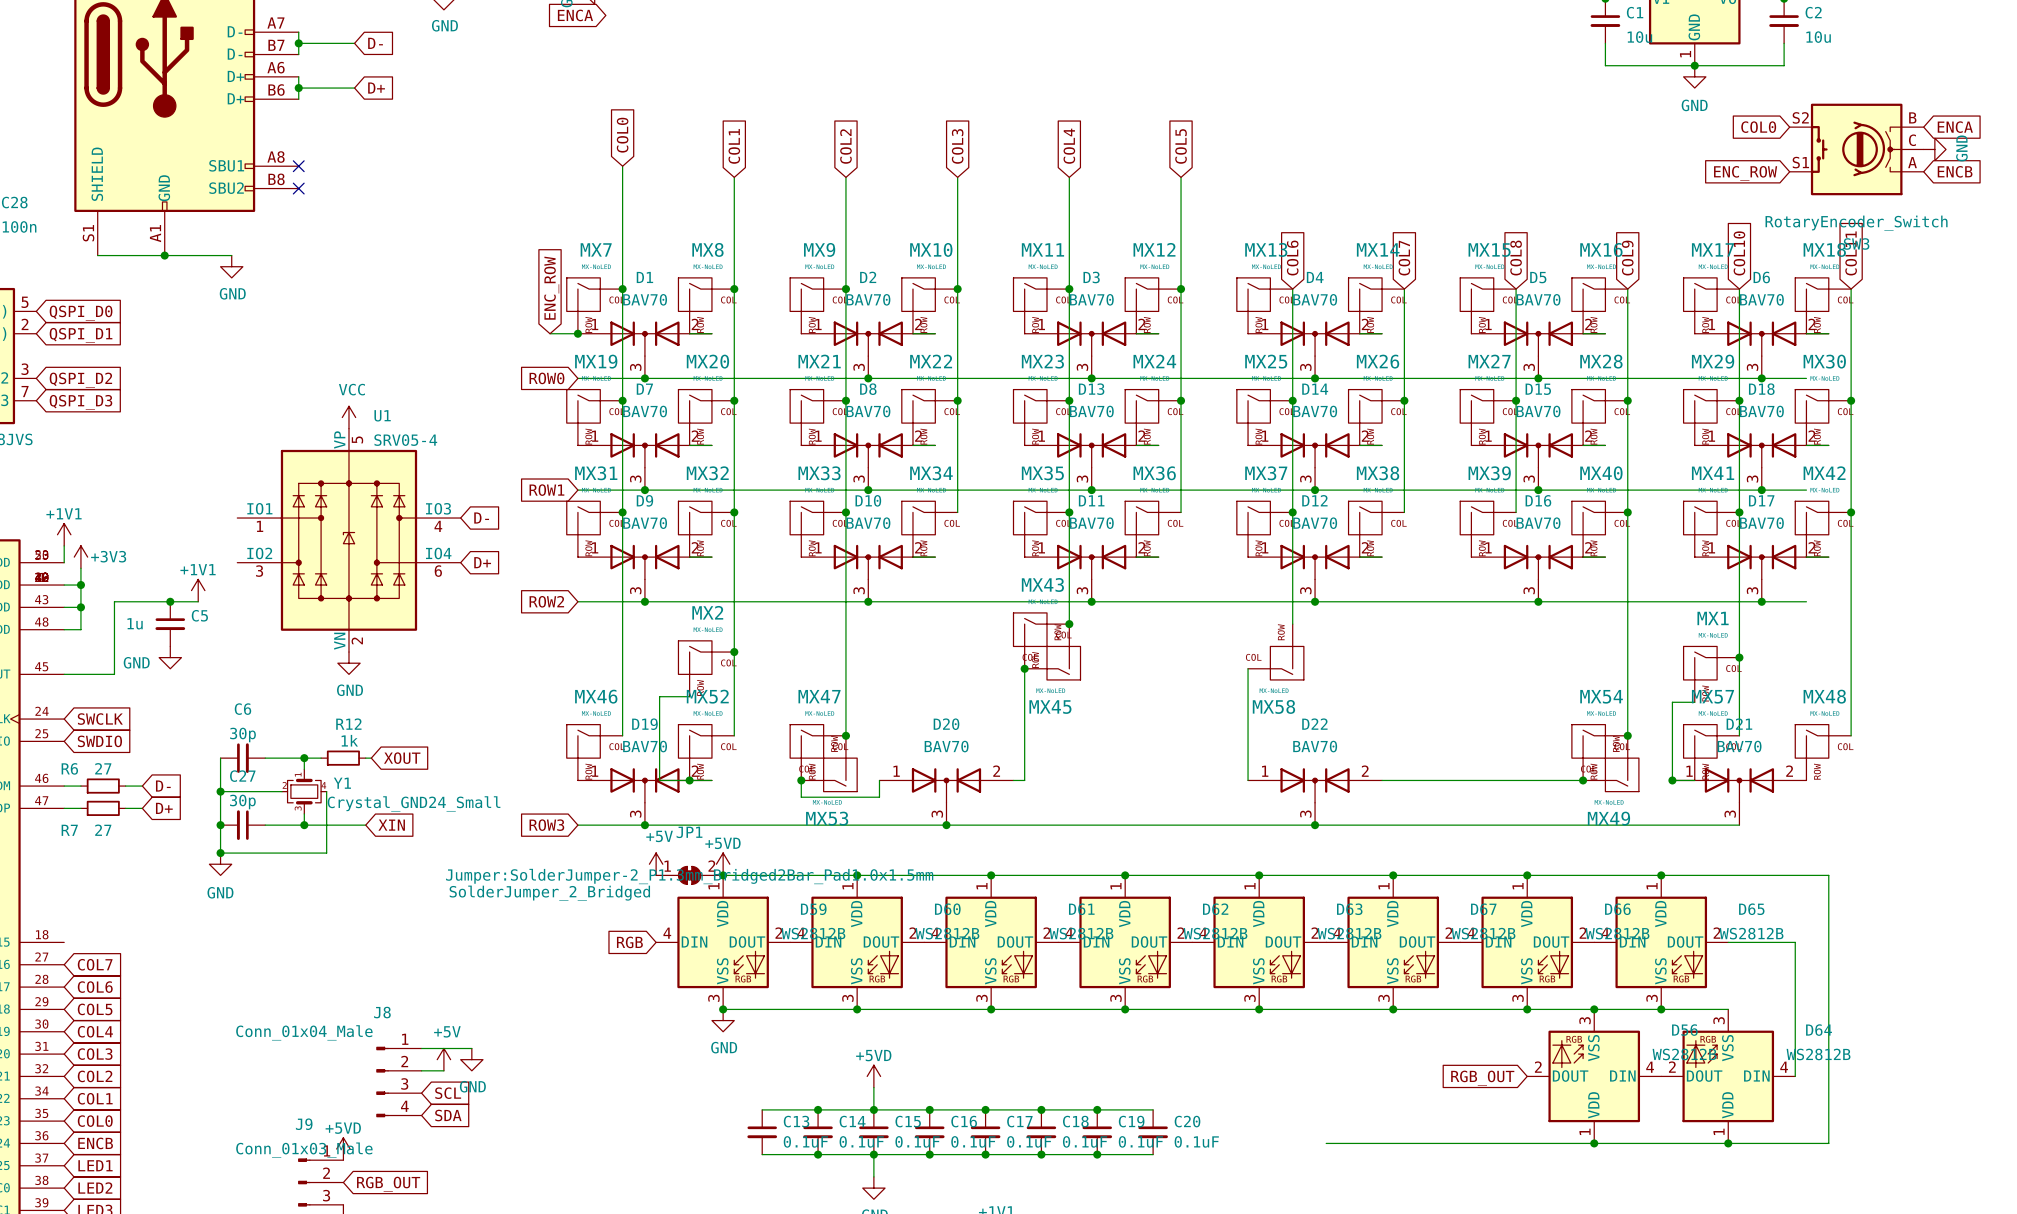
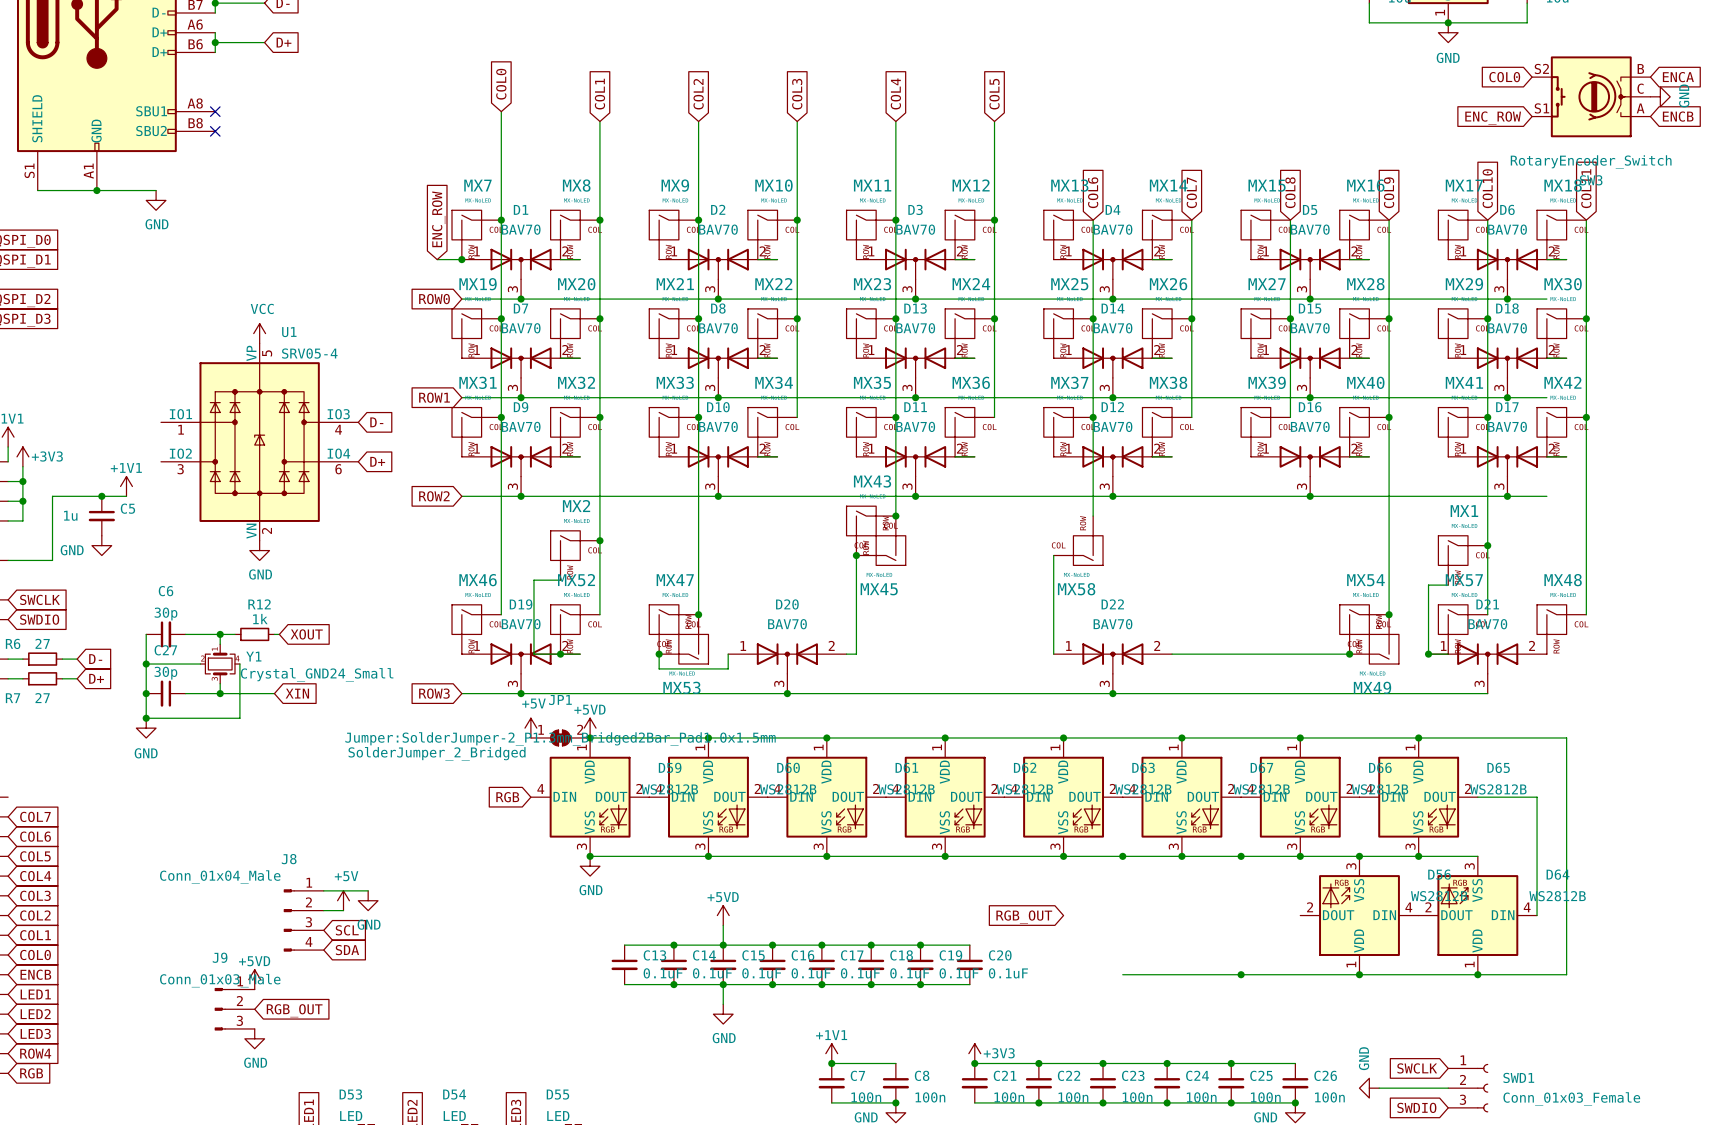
junction: none -> (1122, 856)
junction: none -> (1241, 856)
global label: none -> RGB_OUT (1024, 917)
global label: RGB_OUT (1482, 1078) -> none
junction: none -> (1241, 974)

